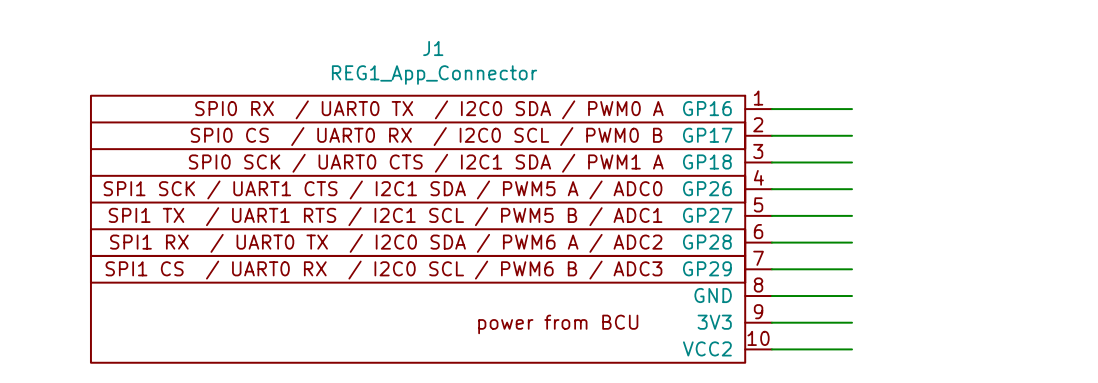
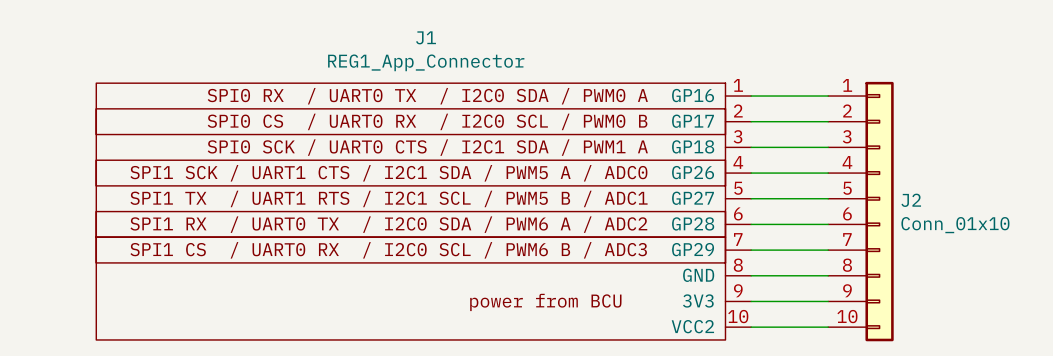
J2: none -> Conn_01x10 (860, 211)

